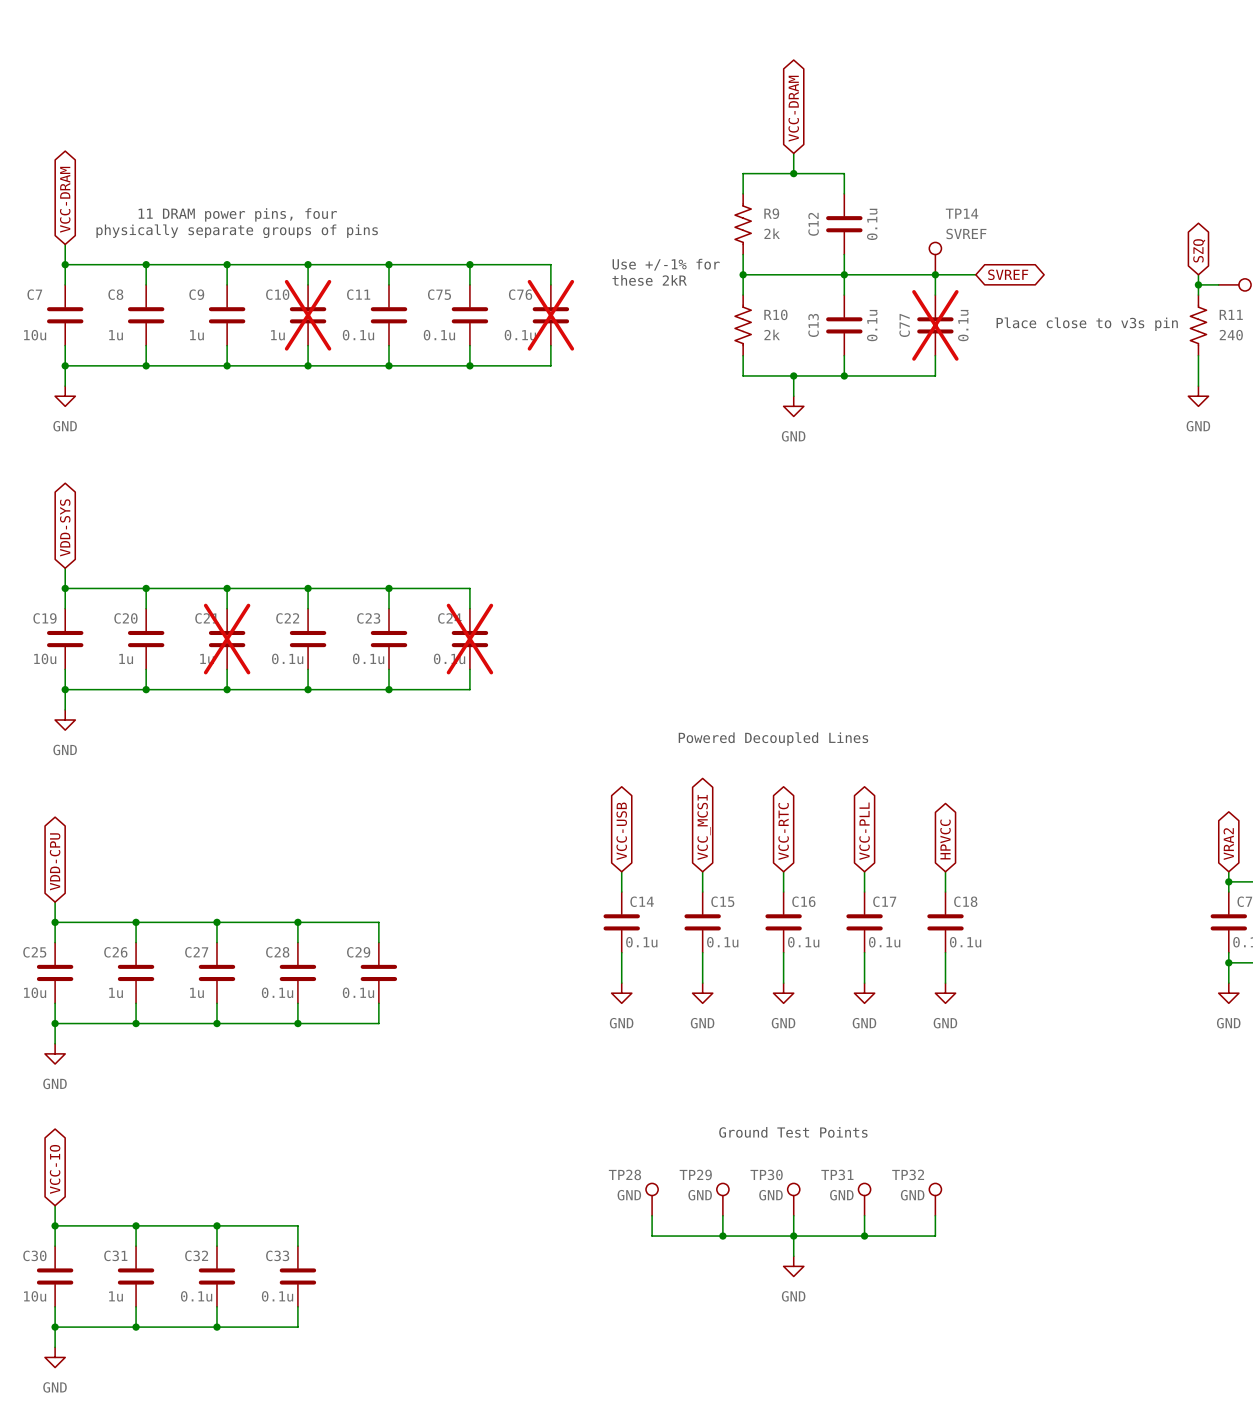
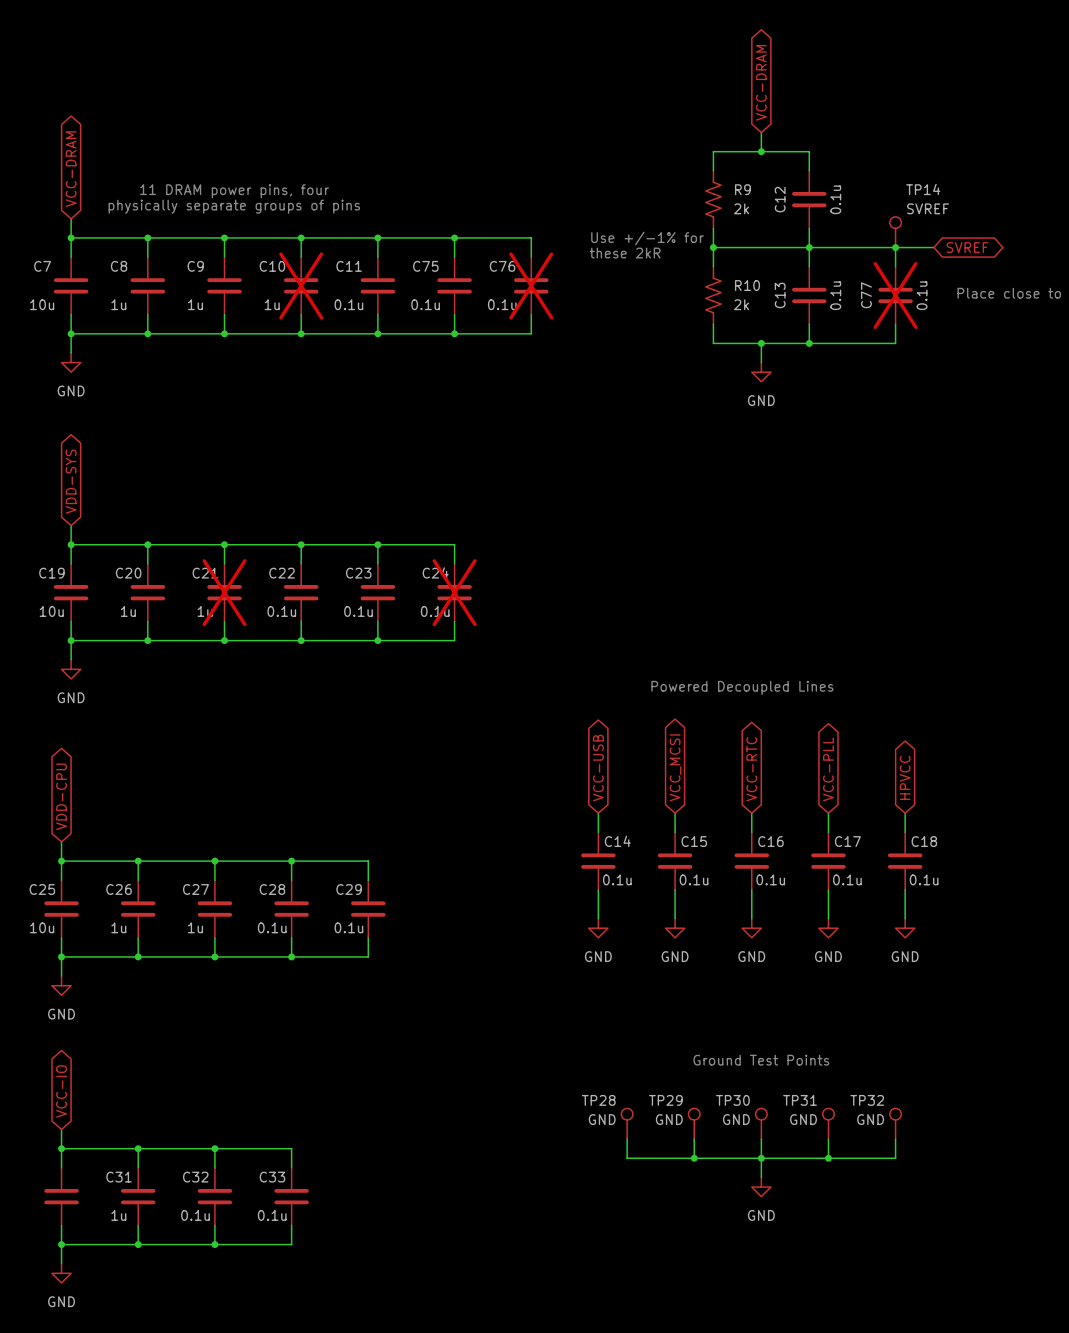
C30 name: C30 (34, 1255) -> none
C30 value: 10u (35, 1296) -> none

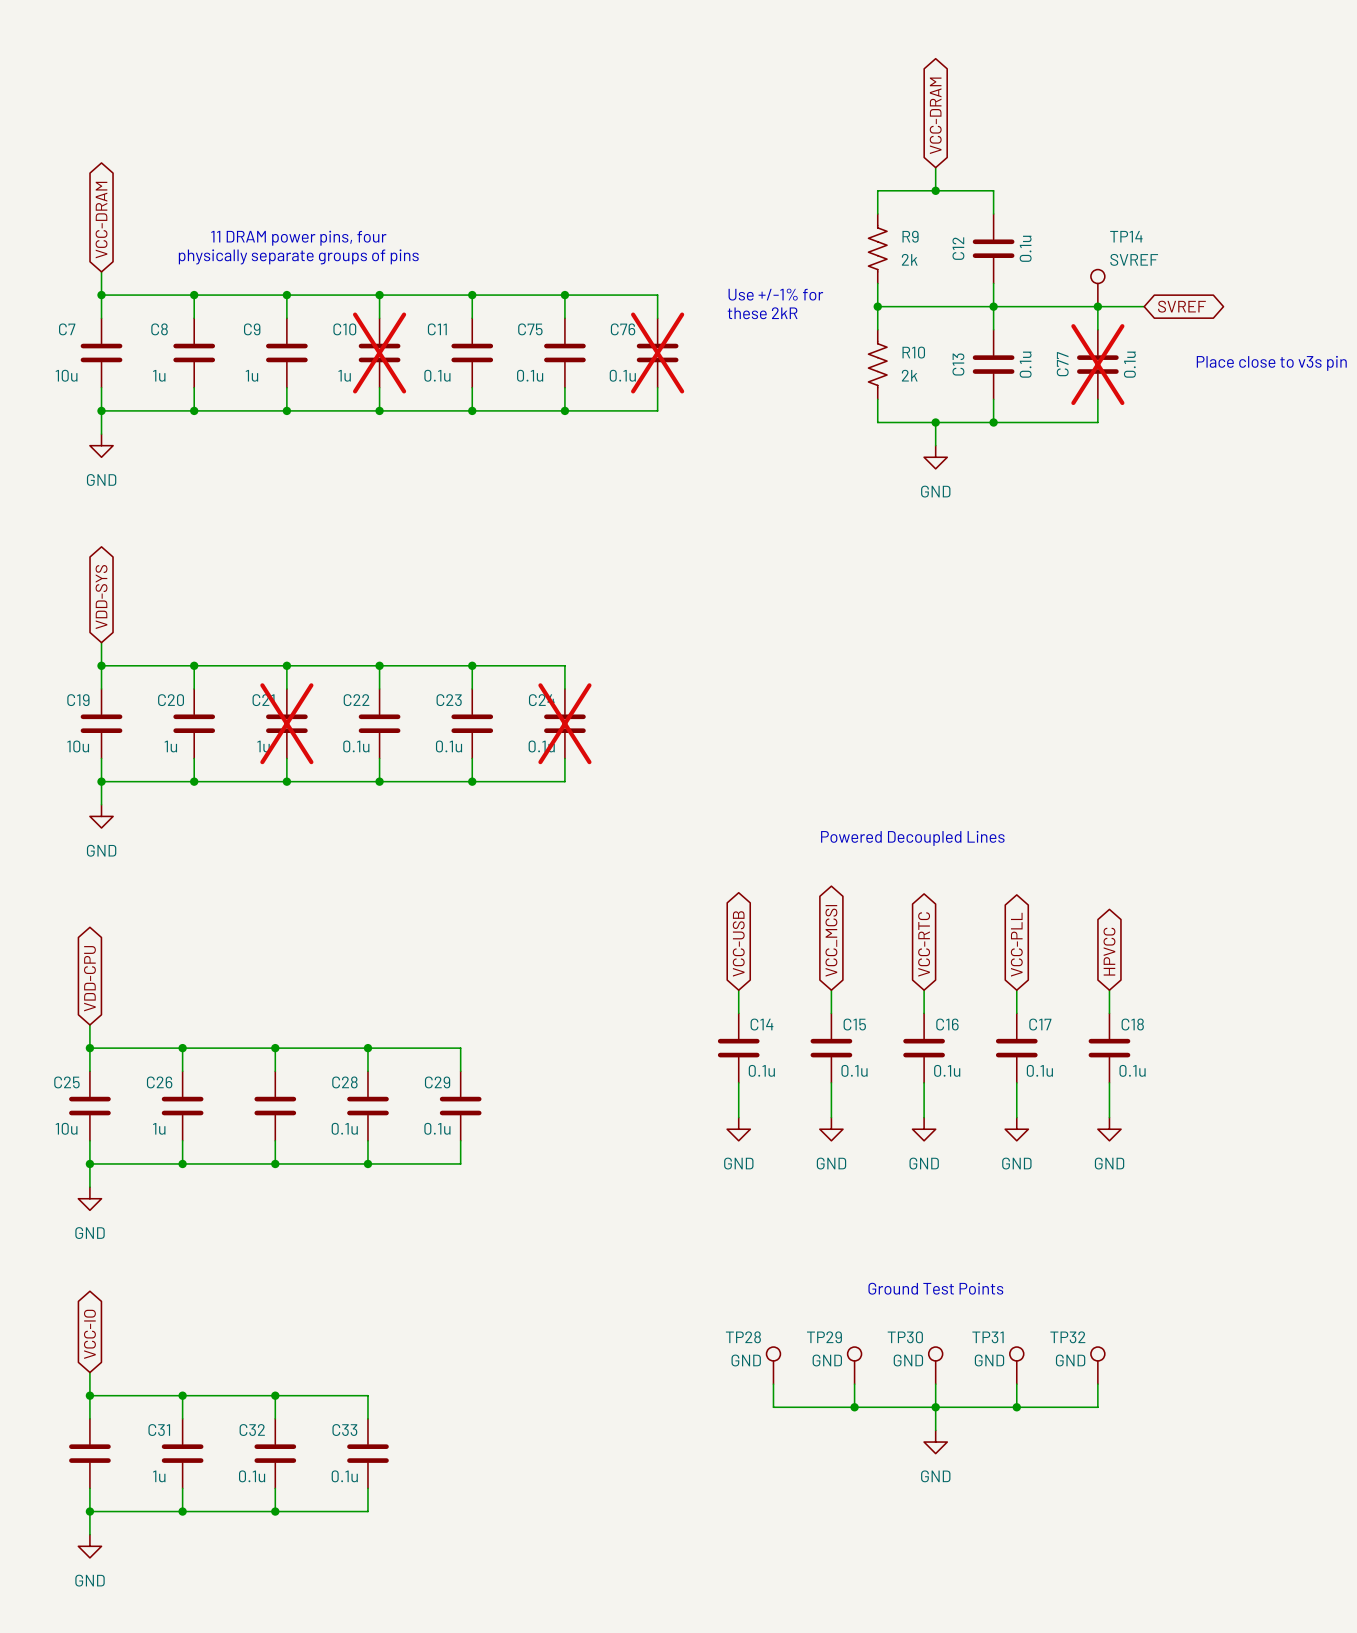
C27 name: C27 (195, 889) -> none
C27 value: 1u (195, 927) -> none

